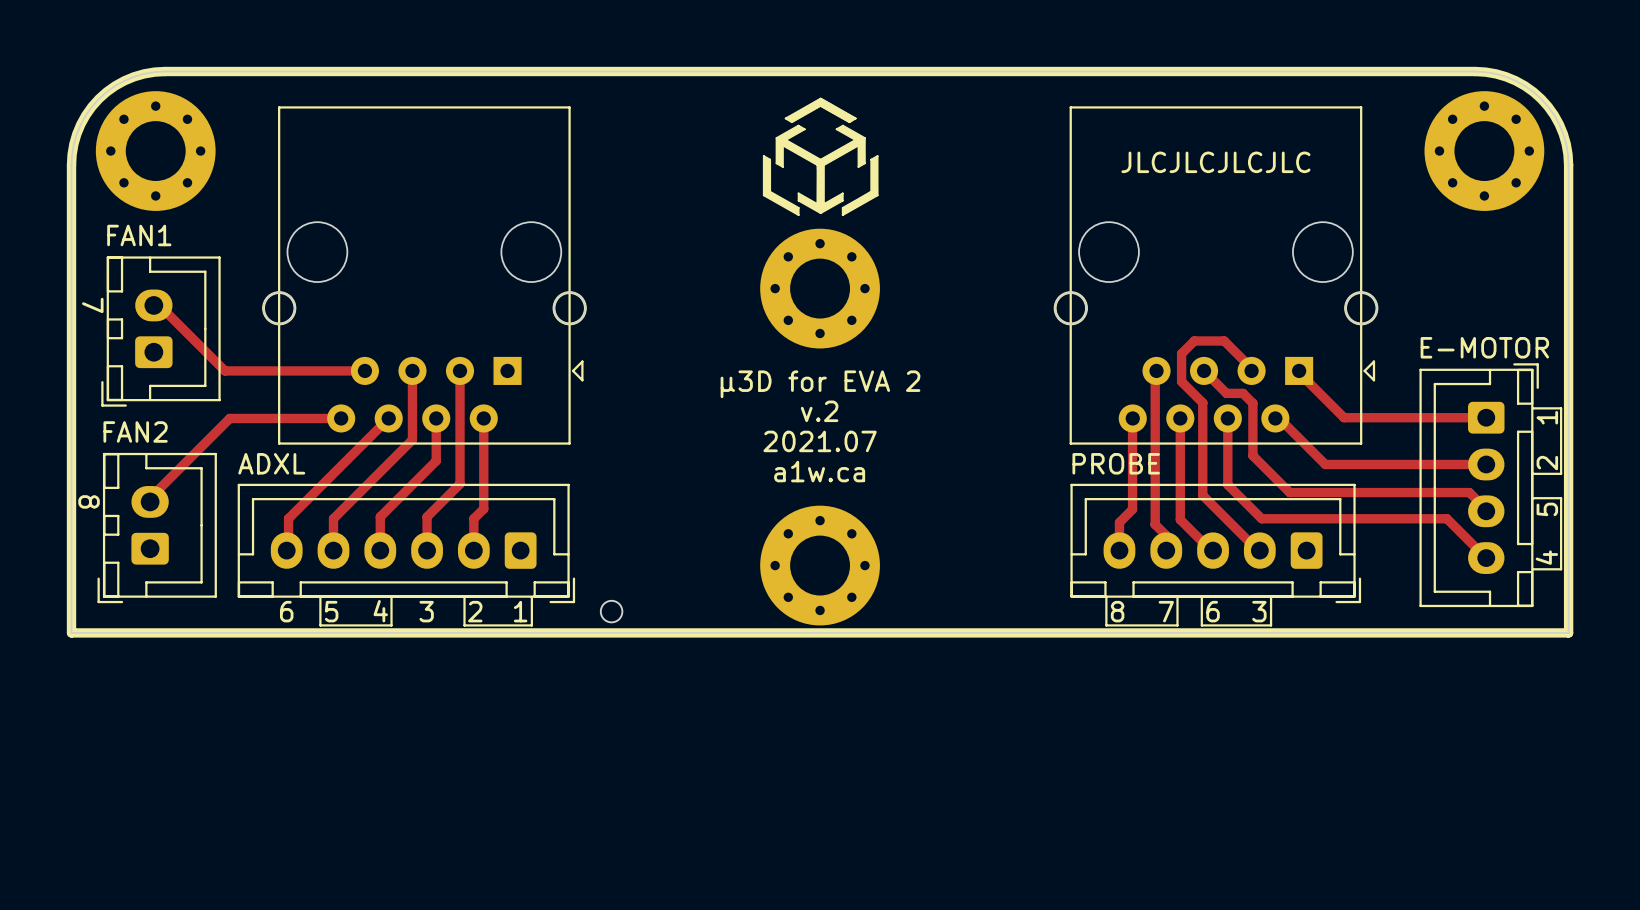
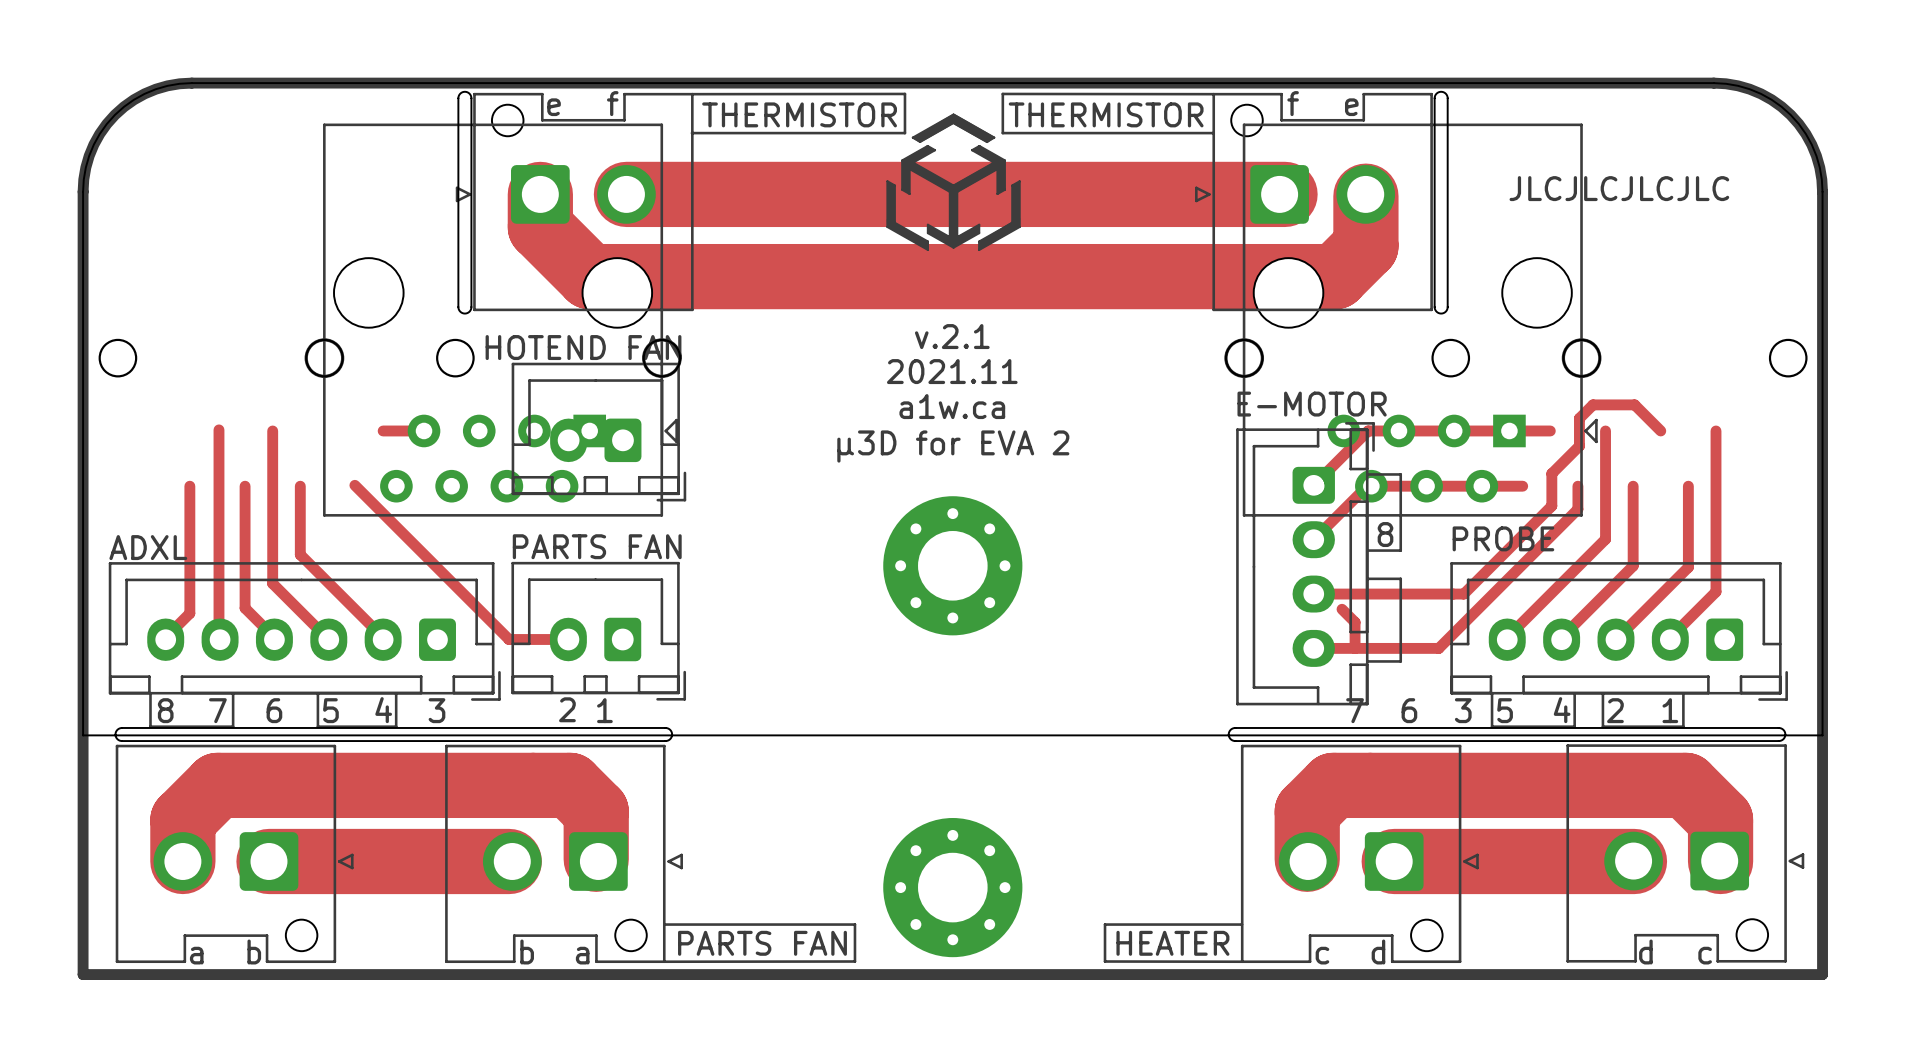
line: none -> (692, 94) (904, 93) (904, 133) (691, 133)
line: none -> (1213, 94) (1002, 93) (1002, 133) (1213, 133)
board edge: none -> (458, 98) (458, 307) (460, 311) (464, 313) (469, 311) (471, 307) (471, 98) (469, 93) (464, 91) (460, 93) (458, 98)
board edge: none -> (1434, 98) (1434, 307) (1436, 311) (1441, 313) (1445, 311) (1447, 307) (1447, 98) (1445, 93) (1441, 91) (1436, 93) (1434, 98)
text: none -> f (612, 103)
text: none -> f (1293, 103)
text: none -> e (554, 107)
text: none -> e (1351, 107)
text: none -> THERMISTOR (799, 114)
text: none -> THERMISTOR (1106, 114)
part: (155, 151) -> none
part: (1484, 151) -> none
text position: JLCJLCJLCJLC (1215, 162) -> JLCJLCJLCJLC (1619, 188)
track: none -> (540, 194) (540, 227) (589, 276) (1335, 276) (1365, 246) (1365, 196)
track: none -> (626, 194) (1285, 194)
part: none -> (574, 202)
part: none -> (1313, 202)
part: (820, 288) -> none
text: none -> v.2.1 (952, 336)
round board edge: none -> [98, 338, 138, 378]
round board edge: none -> [436, 338, 475, 378]
round board edge: none -> [1431, 338, 1471, 378]
round board edge: none -> [1768, 338, 1808, 378]
track: (155, 301) (224, 370) (329, 370) -> none
text rotation: 0° (92, 305) -> 90° counterclockwise (217, 710)
text position: 7 (92, 305) -> 7 (217, 710)
text: none -> 2021.11 (952, 371)
part: FAN1 (160, 331) -> none
track: (1250, 367) (1224, 340) (1194, 340) (1181, 353) (1181, 381) (1202, 402) (1202, 495) (1259, 552) -> none
track: none -> (218, 429) (220, 639)
track: none -> (272, 430) (272, 583) (326, 637)
track: (412, 370) (412, 439) (333, 518) (333, 556) -> none
track: (460, 370) (460, 483) (427, 516) (427, 554) -> none
track: (1204, 370) (1226, 393) (1242, 393) (1252, 403) (1252, 455) (1289, 492) (1469, 492) (1488, 511) -> none
track: none -> (1550, 430) (1368, 430) (1313, 485)
track: none -> (1605, 430) (1605, 539) (1507, 637)
track: none -> (1660, 430) (1634, 404) (1593, 404) (1579, 418) (1579, 446) (1551, 473) (1551, 505) (1463, 594) (1311, 594)
track: none -> (1715, 430) (1715, 591) (1668, 639)
part: none -> HOTEND FAN (598, 432)
track: (1155, 371) (1155, 524) -> none
track: (1299, 372) (1344, 417) (1495, 417) -> none
line: (1533, 408) (1561, 408) (1561, 473) (1533, 473) -> (1368, 474) (1400, 474) (1400, 550) (1368, 550)
text: v.2 (819, 411) -> none
track: (1276, 415) (1325, 464) (1493, 464) -> none
track: none -> (354, 485) (509, 639) (568, 639)
text rotation: 0° (1547, 417) -> 90° clockwise (1670, 710)
text position: 1 (1547, 417) -> 1 (1670, 710)
track: none -> (189, 486) (189, 613) (165, 637)
track: none -> (245, 486) (245, 608) (274, 637)
track: none -> (300, 486) (300, 554) (383, 637)
track: (341, 418) (229, 418) (140, 507) -> none
track: (388, 418) (288, 518) (288, 558) -> none
track: (436, 418) (436, 460) (380, 516) (380, 554) -> none
track: (483, 418) (483, 508) (473, 518) (473, 554) -> none
track: (1180, 418) (1180, 519) (1213, 552) -> none
track: (1227, 418) (1227, 484) (1261, 518) (1446, 518) (1486, 558) -> none
track: none -> (1522, 486) (1367, 486) (1313, 539)
track: none -> (1577, 486) (1577, 509) (1438, 648) (1311, 648)
track: none -> (1633, 486) (1633, 566) (1559, 639)
track: none -> (1688, 486) (1688, 567) (1615, 639)
track: (1132, 421) (1132, 509) (1119, 522) (1119, 558) -> none
text: 2021.07 (820, 441) -> none
part value position: ADXL (271, 463) -> ADXL (148, 547)
text rotation: 0° (1547, 463) -> 90° clockwise (1615, 710)
text position: 2 (1547, 463) -> 2 (1615, 710)
text position: a1w.ca (819, 471) -> a1w.ca (952, 406)
part position: (1479, 485) -> (1305, 563)
line: (1533, 498) (1561, 498) (1561, 569) (1533, 569) -> (1368, 578) (1400, 578) (1400, 661) (1368, 661)
text rotation: 0° (89, 501) -> 90° counterclockwise (165, 710)
text position: 8 (89, 501) -> 8 (165, 710)
text rotation: 0° (1547, 509) -> 90° clockwise (1505, 710)
text position: 5 (1547, 509) -> 5 (1505, 710)
part: FAN2 (157, 528) -> none
part position: (406, 543) -> (304, 631)
part: none -> PARTS FAN (598, 631)
part position: (1215, 543) -> (1619, 631)
text rotation: 0° (1546, 557) -> 90° clockwise (1562, 710)
text position: 4 (1546, 557) -> 4 (1562, 710)
part position: (820, 565) -> (952, 565)
line: none -> (150, 694) (150, 726) (233, 726) (233, 694)
line: (320, 597) (320, 625) -> (317, 694) (317, 726) (372, 726)
line: (391, 597) (391, 625) (340, 625) -> (396, 694) (396, 726)
line: (464, 597) (464, 625) (531, 625) (531, 597) -> none
line: (1106, 597) (1106, 625) (1177, 625) (1177, 597) -> (1492, 694) (1492, 726) (1574, 726) (1574, 694)
line: (1201, 597) (1201, 625) (1271, 625) (1271, 597) -> (1602, 694) (1602, 726) (1683, 726) (1683, 694)
round board edge: [599, 599, 624, 624] -> none
text position: 6 (286, 611) -> 6 (274, 710)
text position: 5 (331, 611) -> 5 (330, 710)
text position: 4 (380, 611) -> 4 (383, 710)
text position: 3 (426, 611) -> 3 (436, 710)
text position: 2 (475, 611) -> 2 (567, 709)
text position: 8 (1117, 611) -> 8 (1385, 534)
board edge: none -> (122, 727) (665, 727) (670, 729) (672, 734) (670, 739) (665, 741) (122, 741) (117, 739) (115, 734) (117, 729) (122, 727)
board edge: none -> (1235, 727) (1778, 727) (1783, 729) (1785, 734) (1783, 739) (1778, 741) (1235, 741) (1230, 739) (1228, 734) (1230, 729) (1235, 727)
line: (71, 632) (1568, 632) -> (83, 735) (83, 974) (1822, 974) (1822, 735)
part: none -> (234, 853)
part: none -> (564, 853)
part: none -> (1359, 853)
part: none -> (1685, 853)
track: none -> (596, 859) (596, 811) (570, 785) (217, 785) (182, 819) (182, 861)
track: none -> (1307, 859) (1307, 811) (1333, 785) (1685, 785) (1720, 819) (1720, 861)
track: none -> (268, 861) (509, 861)
track: none -> (1394, 861) (1634, 861)
part: none -> (952, 887)
line: none -> (665, 924) (854, 924) (854, 961) (664, 961)
line: none -> (1241, 924) (1105, 924) (1105, 961) (1242, 961)
text: none -> PARTS FAN (762, 943)
text: none -> HEATER (1172, 943)
text: none -> b (254, 952)
text: none -> b (527, 952)
text: none -> d (1378, 952)
text: none -> d (1645, 952)
text: none -> a (196, 955)
text: none -> a (582, 955)
text: none -> c (1322, 955)
text: none -> c (1705, 955)

